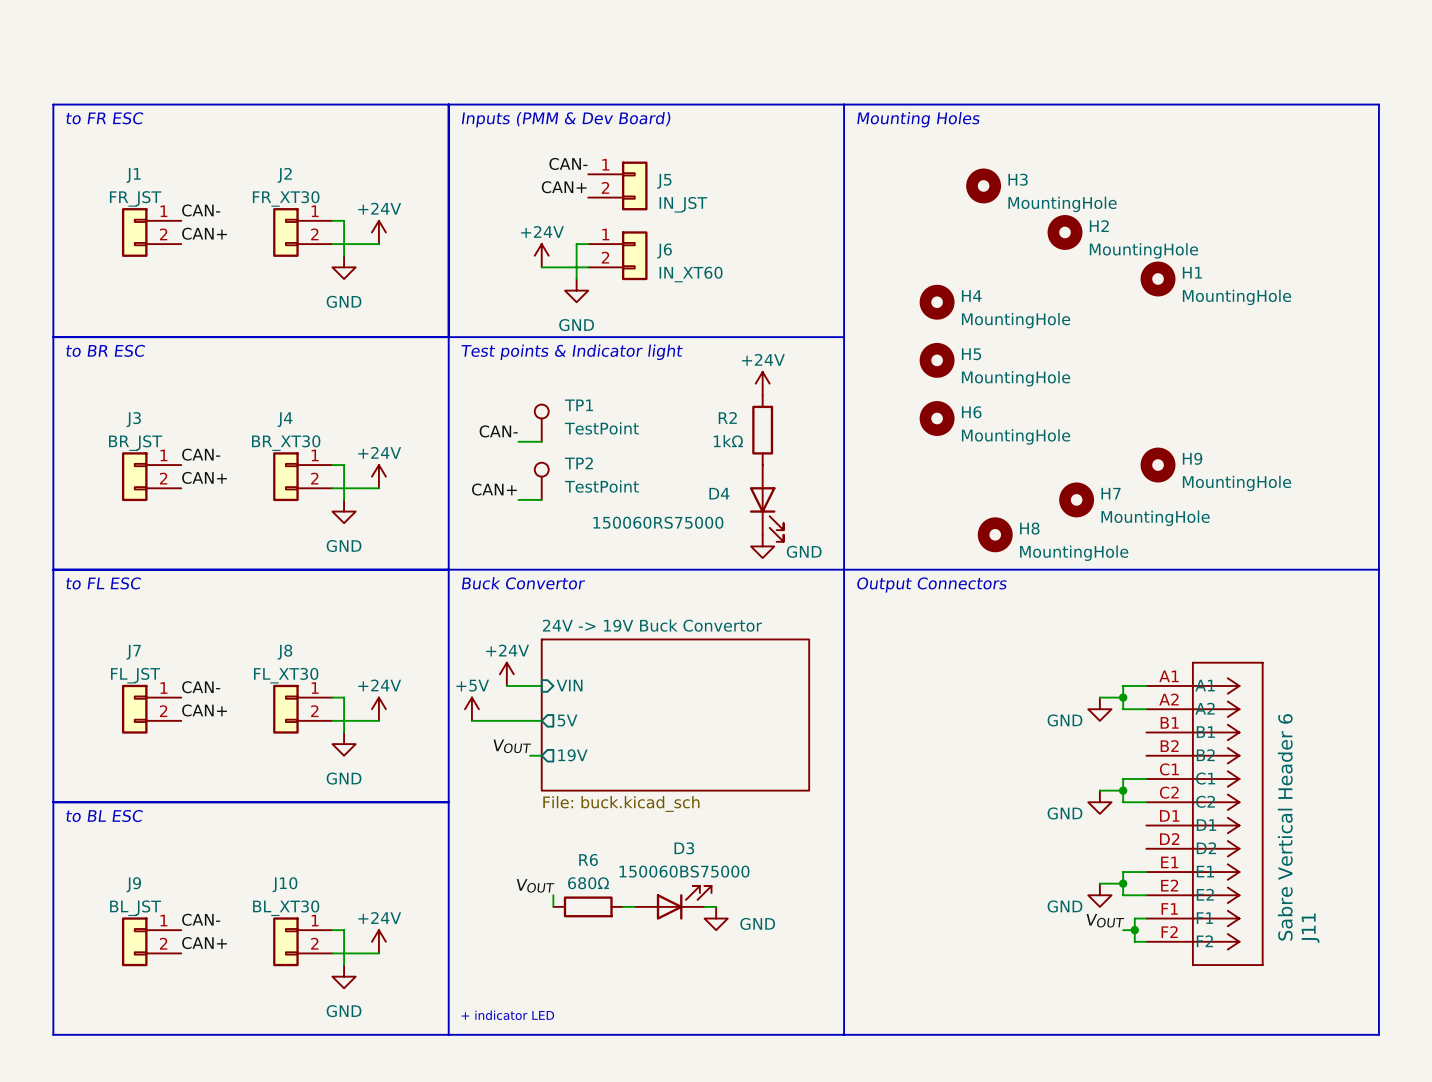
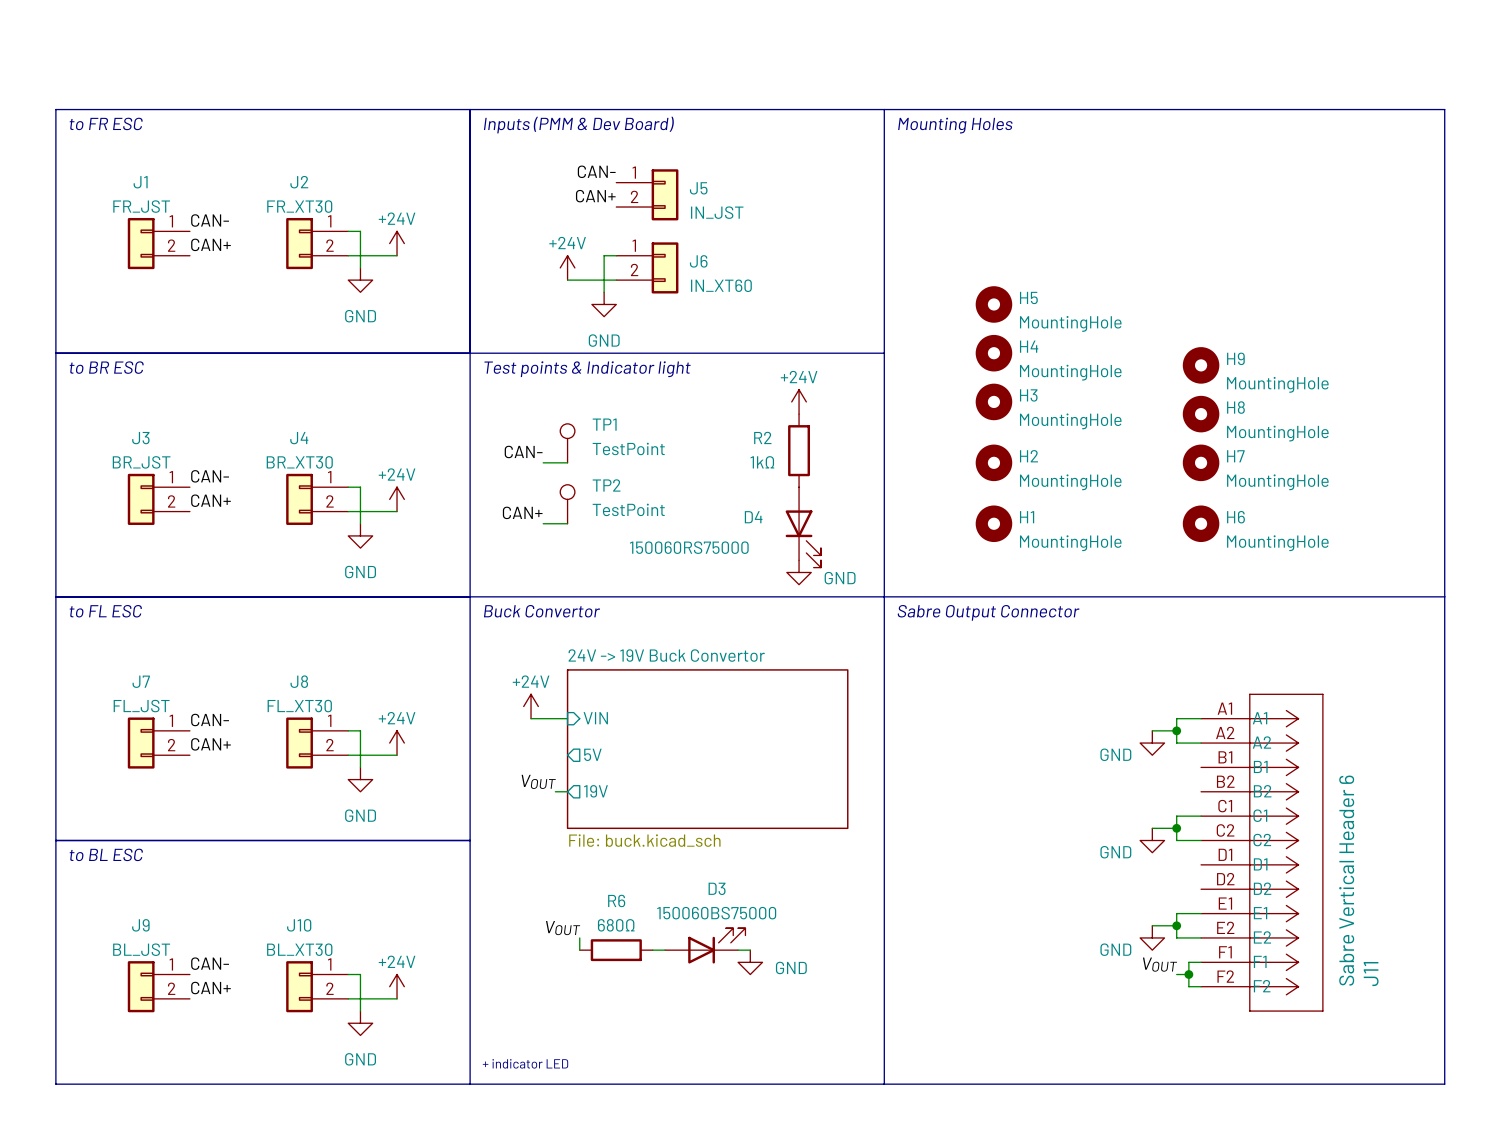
H3 position: (983, 185) -> (993, 401)
H2 position: (1065, 232) -> (993, 462)
H1 position: (1158, 278) -> (993, 523)
H4 position: (937, 302) -> (993, 353)
H5 position: (937, 360) -> (993, 304)
H6 position: (937, 418) -> (1201, 523)
H9 position: (1158, 465) -> (1201, 365)
H7 position: (1076, 499) -> (1201, 462)
H8 position: (995, 534) -> (1201, 414)
text: Output Connectors (931, 584) -> Sabre Output Connector (988, 612)
power symbol: +5V (471, 709) -> none
wire: (471, 720) (541, 720) -> none

